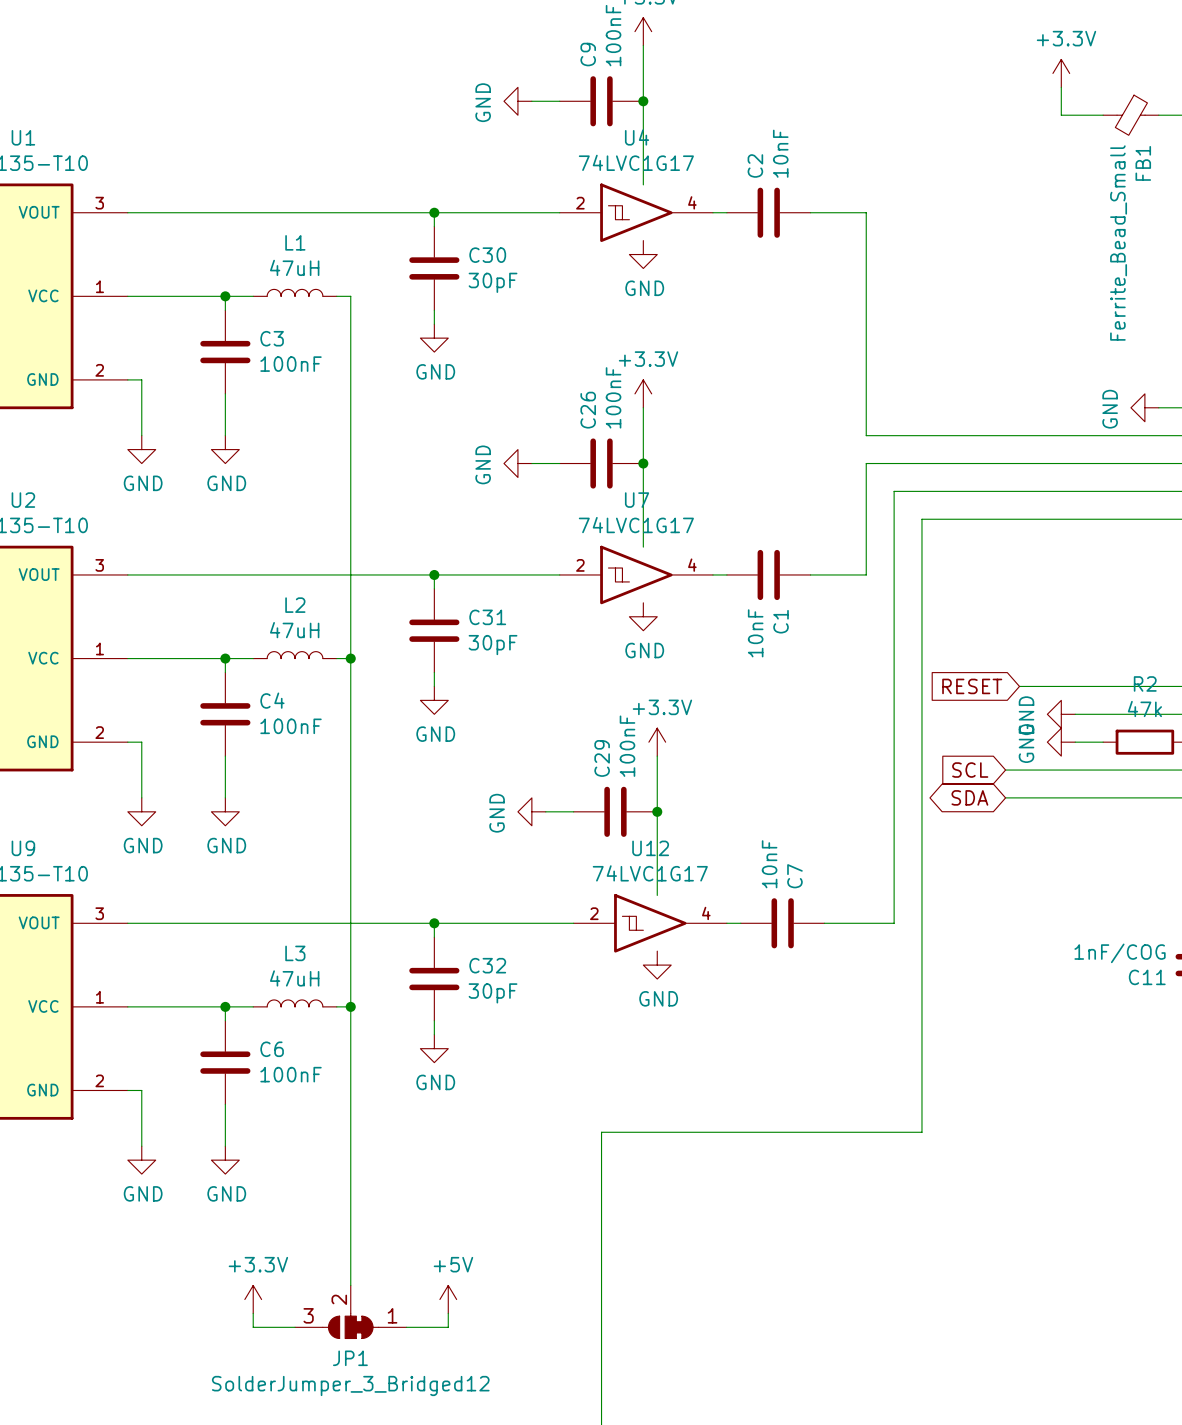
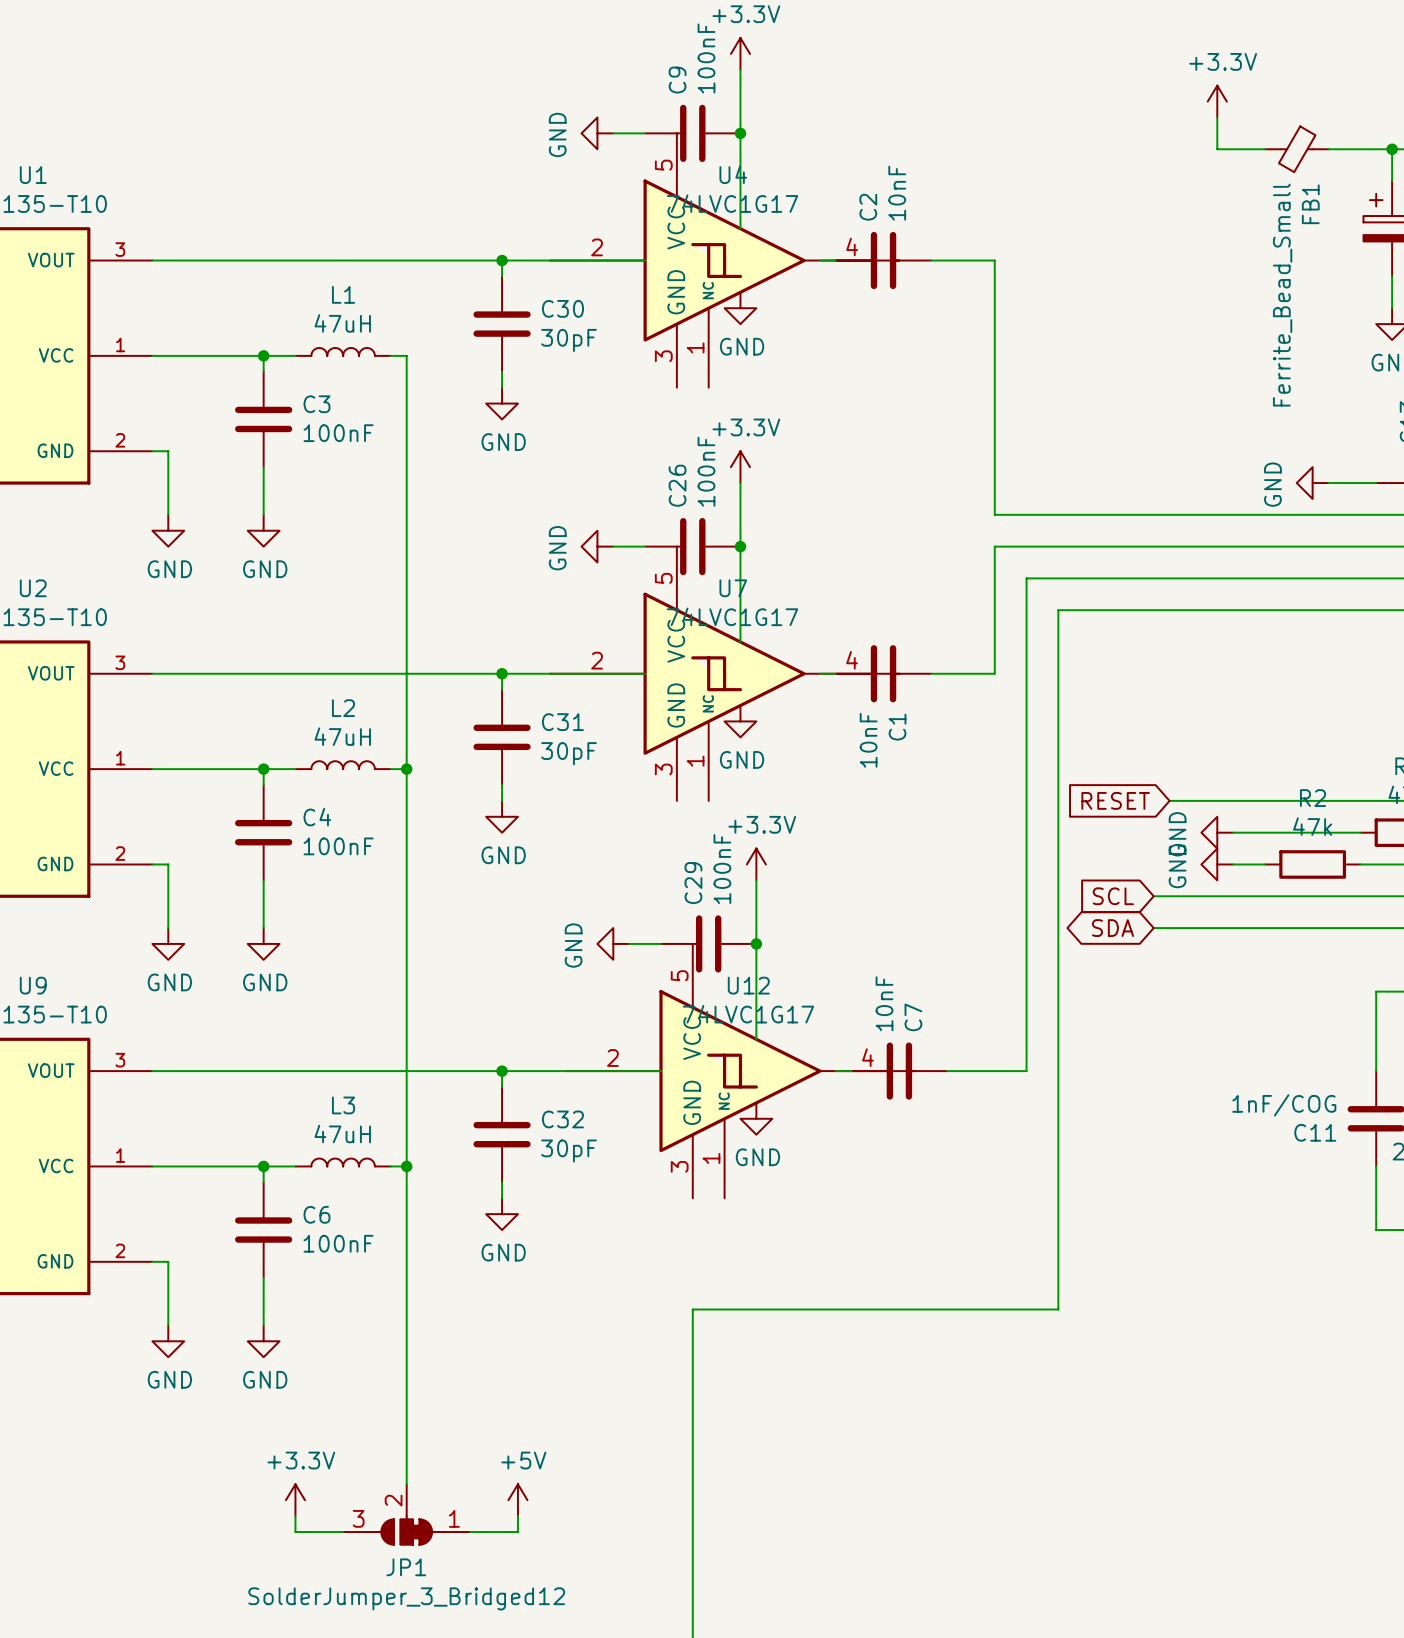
U4 symbol: [559, 183, 713, 242] -> [549, 133, 900, 388]
U7 symbol: [559, 545, 713, 605] -> [549, 546, 900, 801]
U12 symbol: [573, 894, 727, 953] -> [565, 943, 916, 1199]

